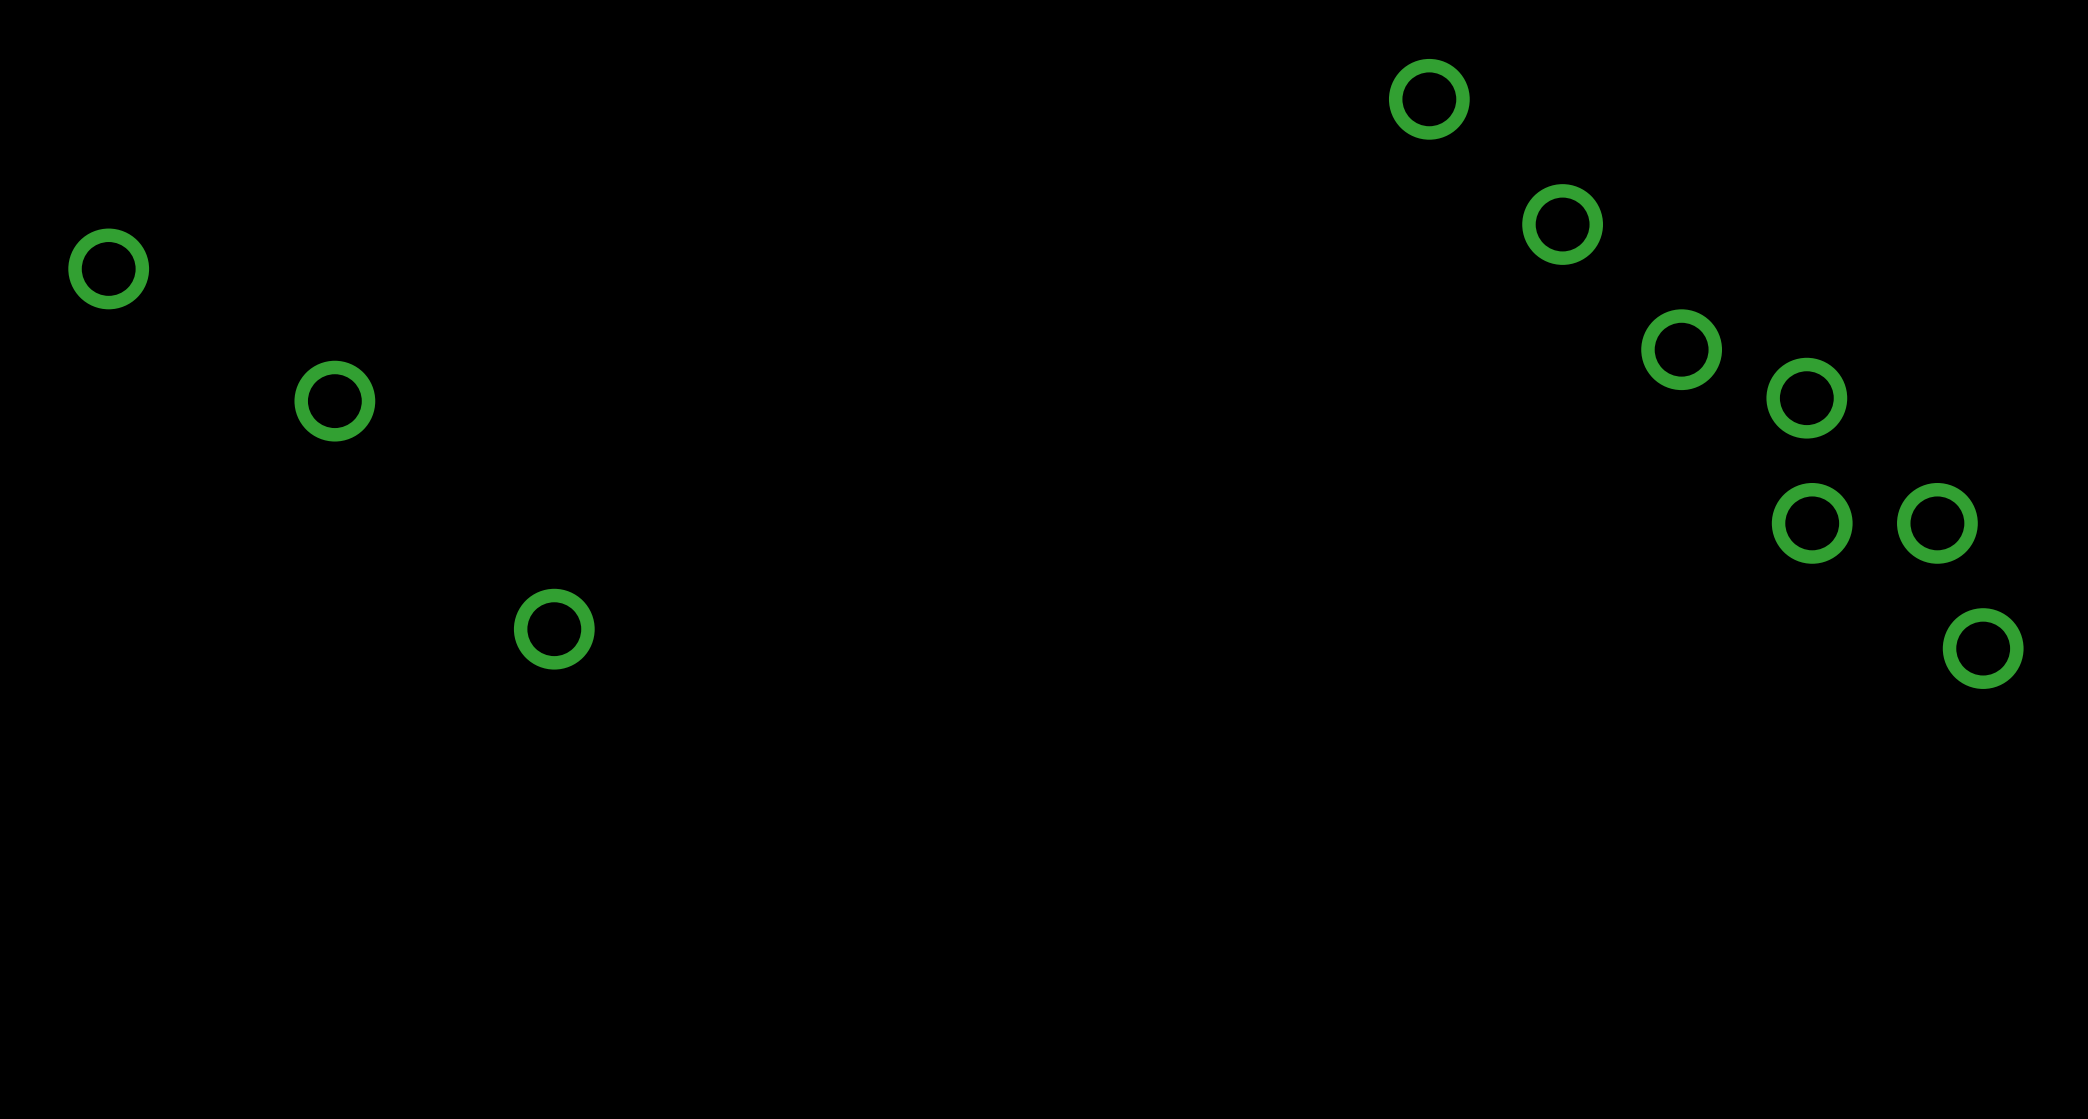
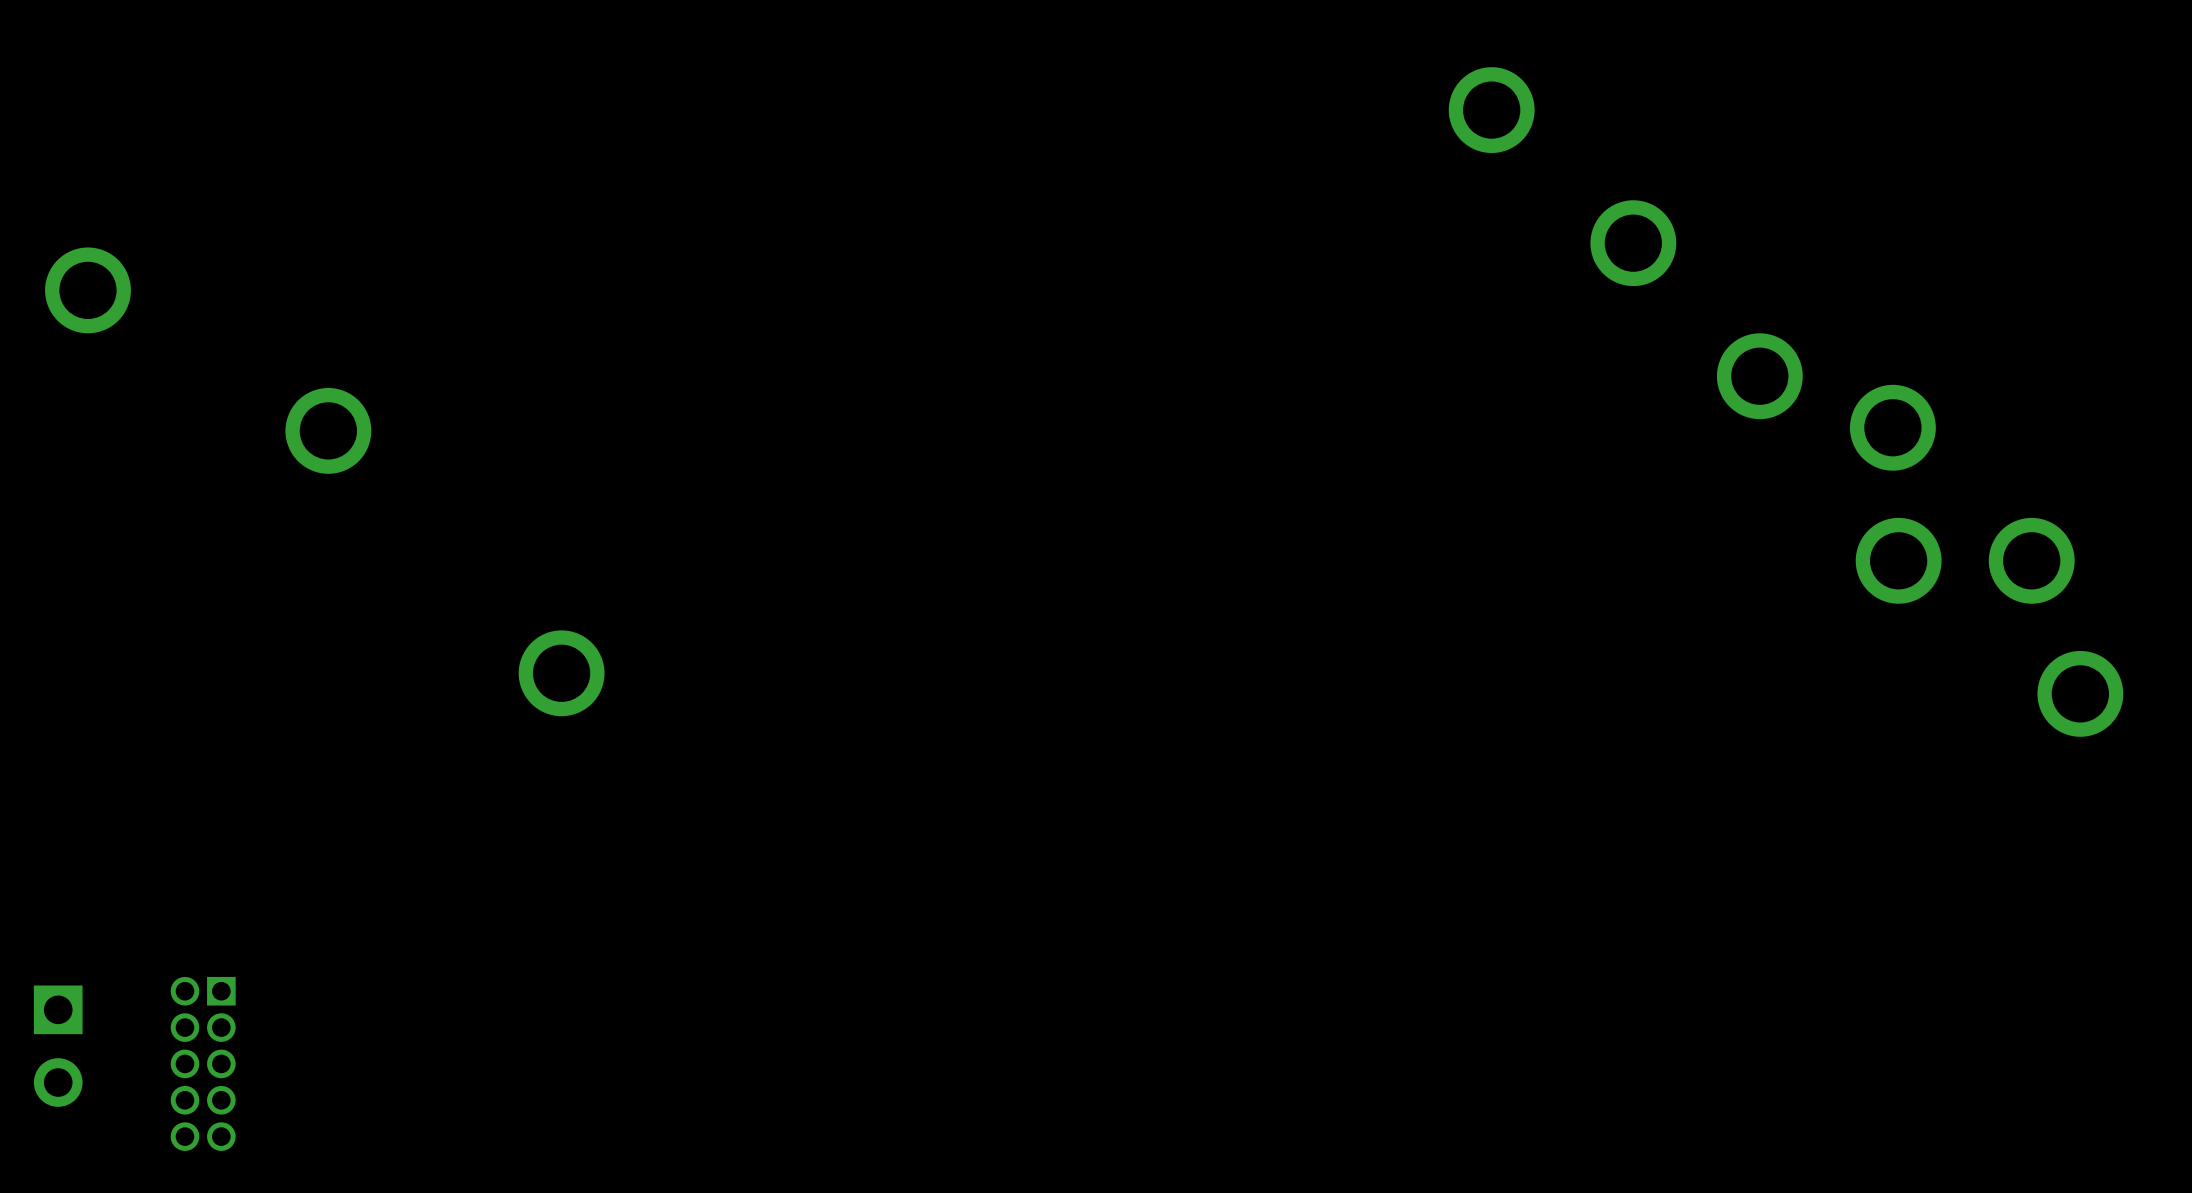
part: none -> (58, 1046)
part: none -> (203, 1063)

